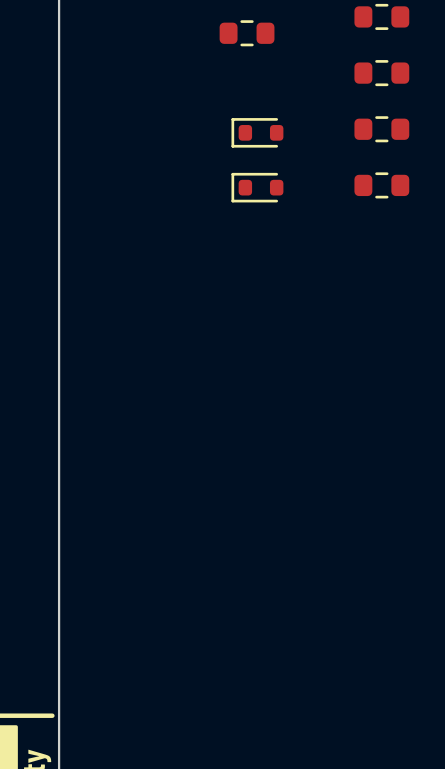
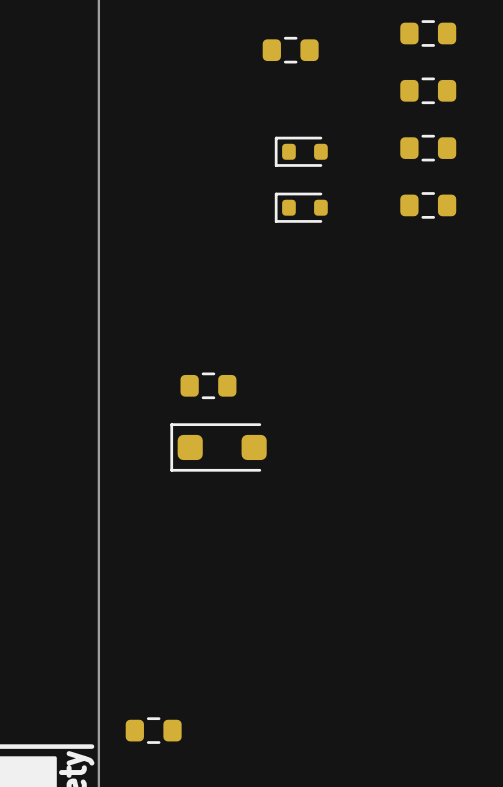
part: none -> (208, 385)
part: none -> (218, 447)
part: none -> (153, 730)

